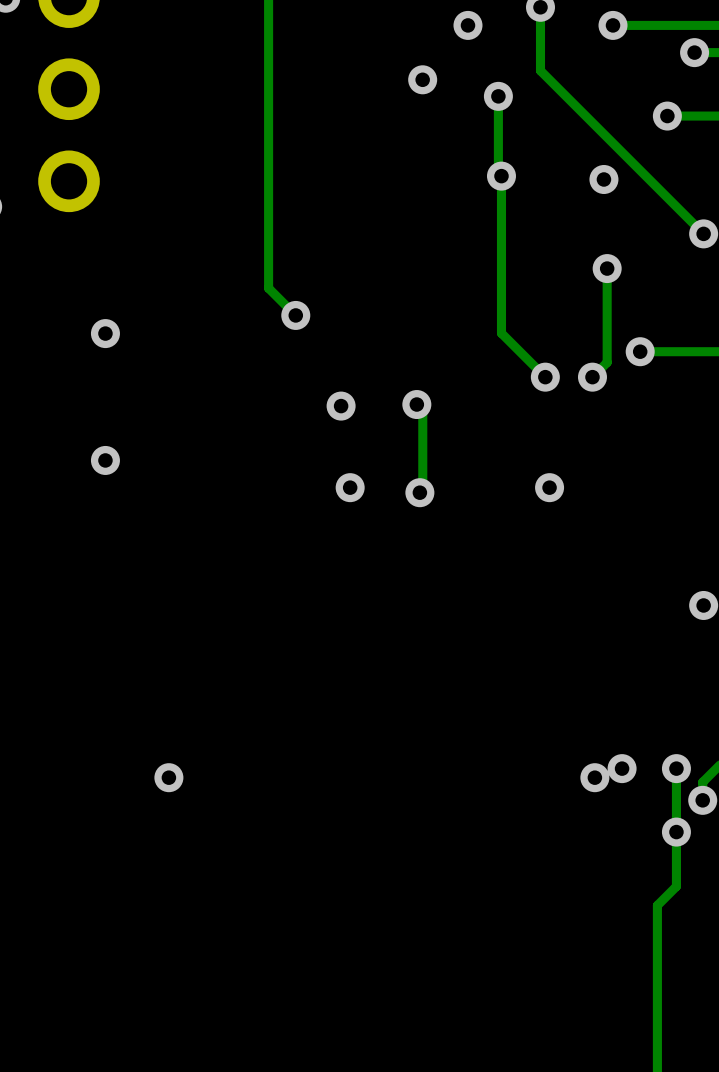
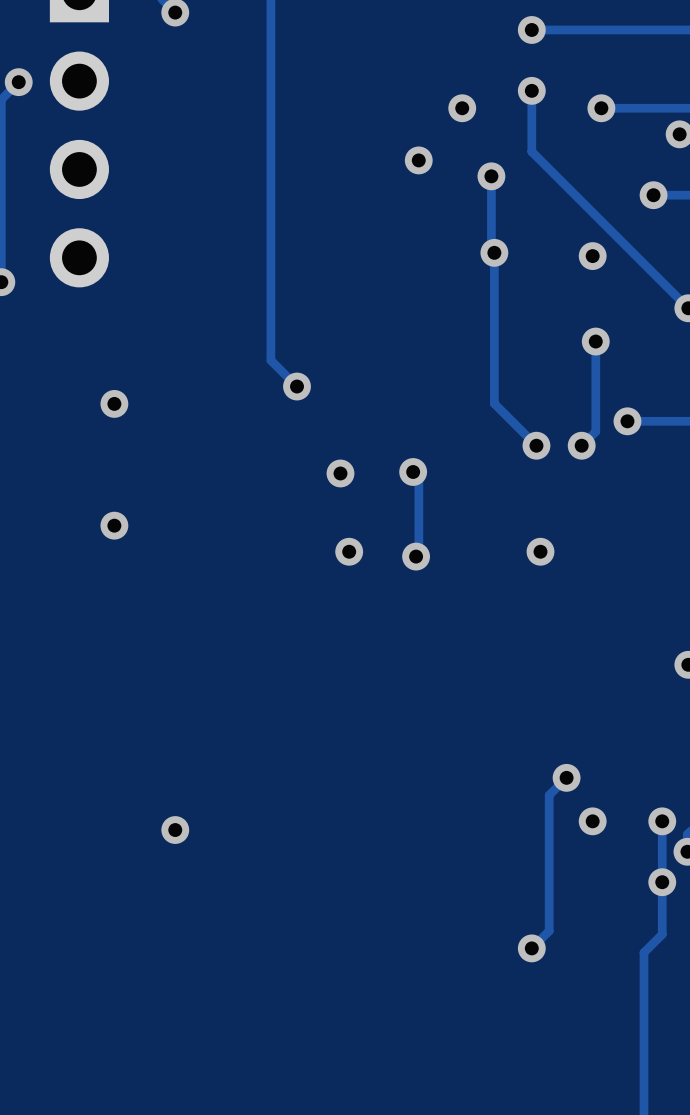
track: none -> (566, 777) (549, 795) (549, 931) (531, 948)
via: none -> (566, 777)
via: none -> (592, 821)
via: (622, 768) -> none
via: (594, 777) -> none
via: none -> (531, 948)

